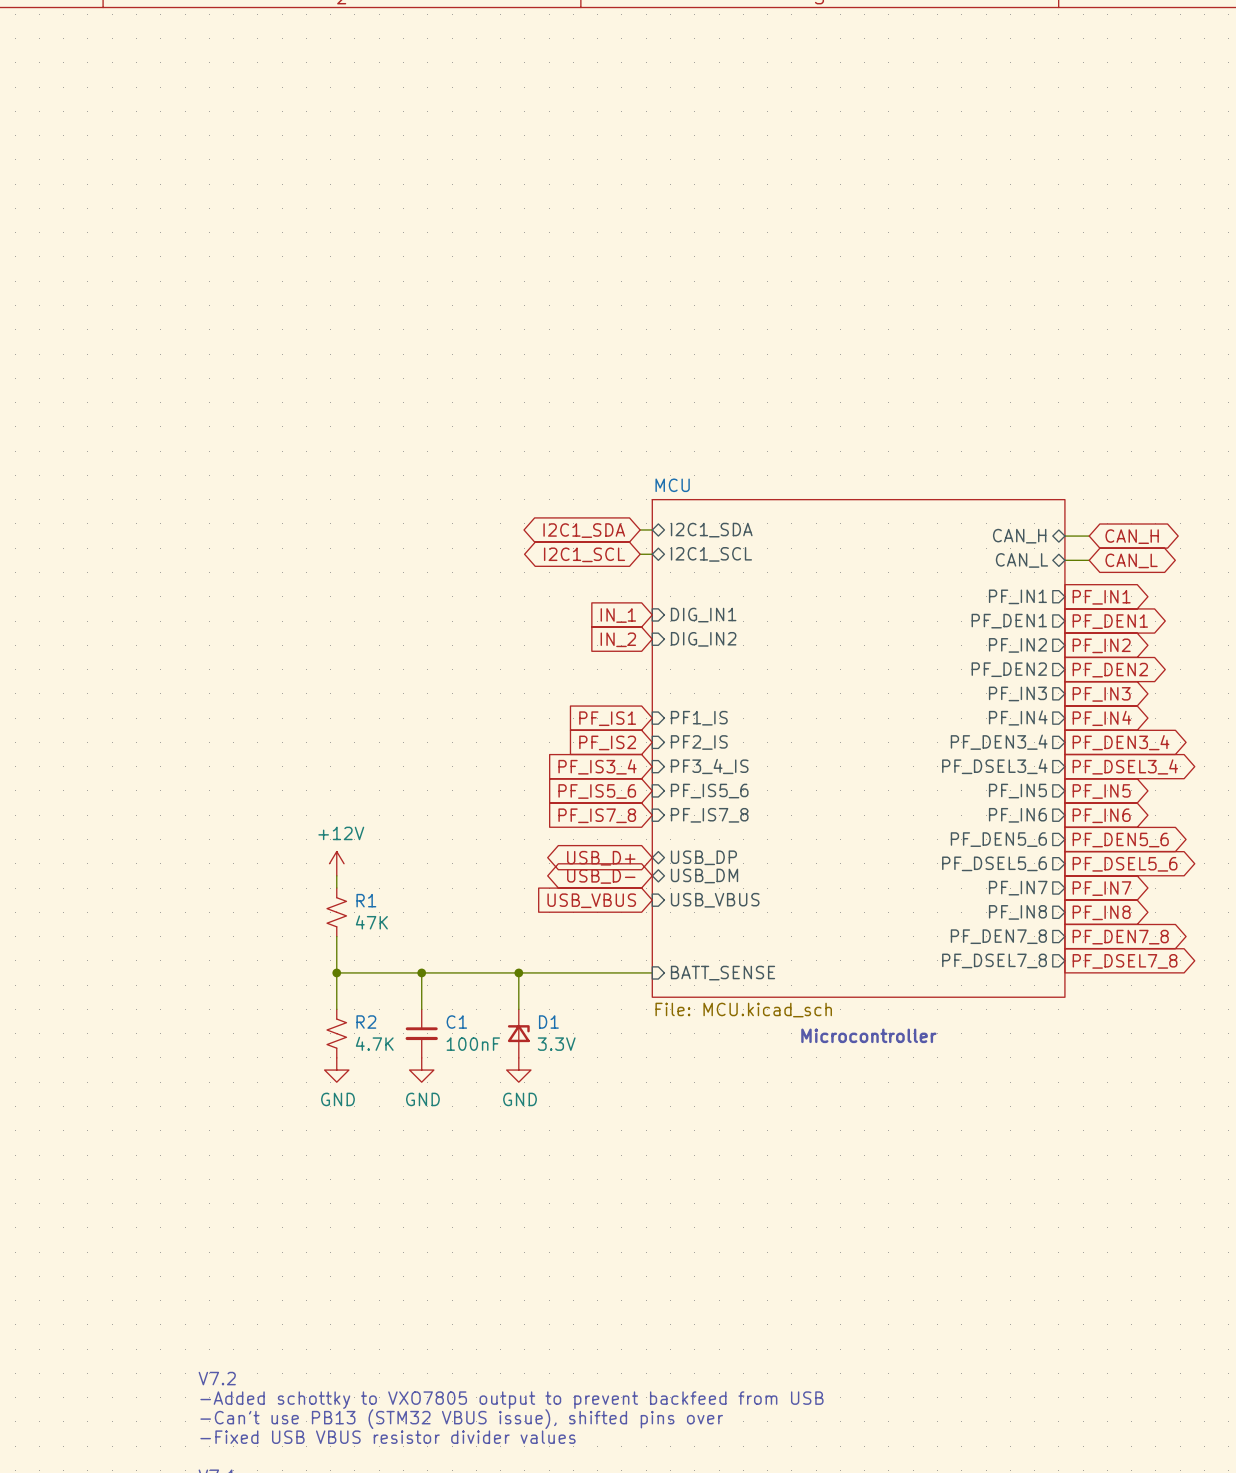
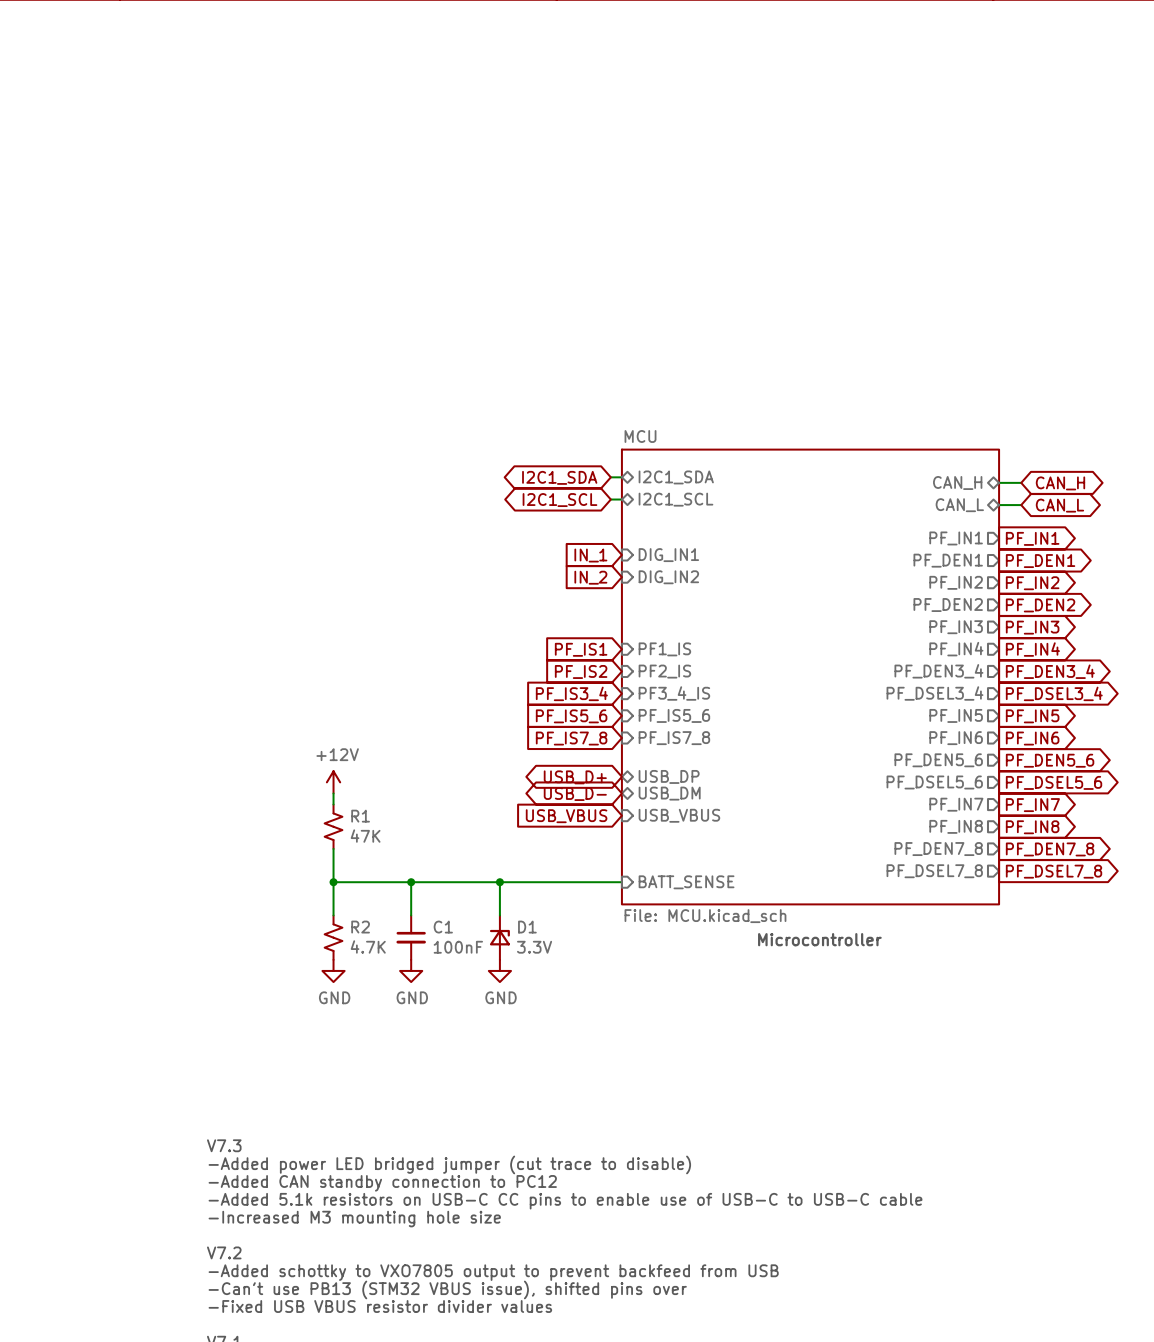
text: none -> V7.3 (224, 1145)
text: none -> -Added power LED bridged jumper (cut trace to disable) (449, 1164)
text: none -> -Added CAN standby connection to PC12 (382, 1183)
text: none -> -Added 5.1k resistors on USB-C CC pins to enable use of USB-C to USB-C cable (565, 1201)
text: none -> -Increased M3 mounting hole size (354, 1219)

